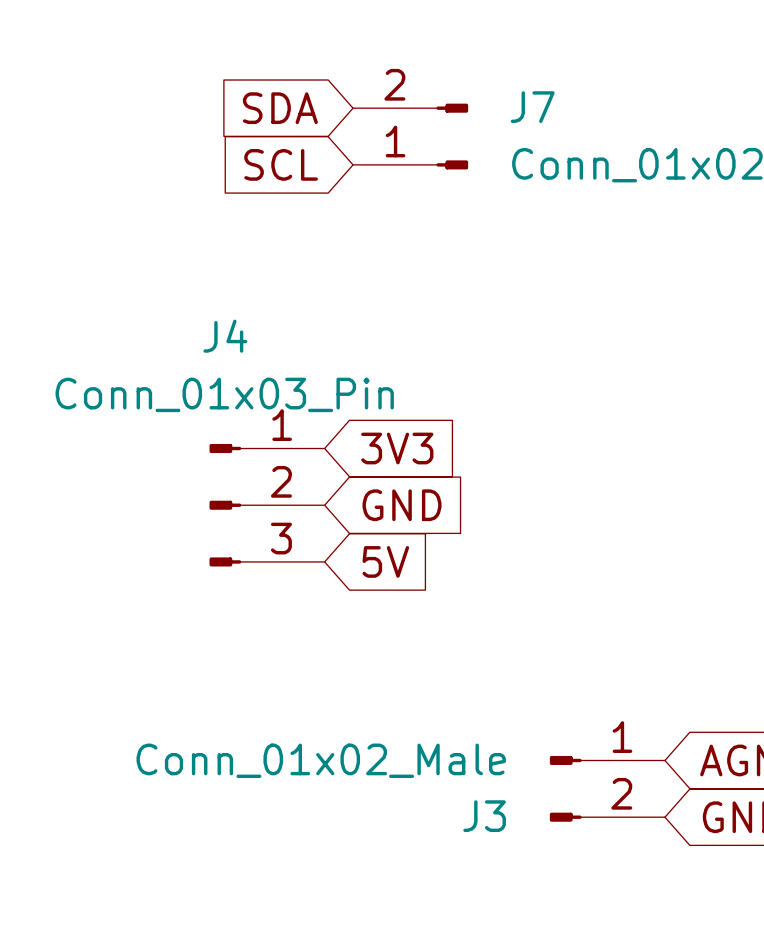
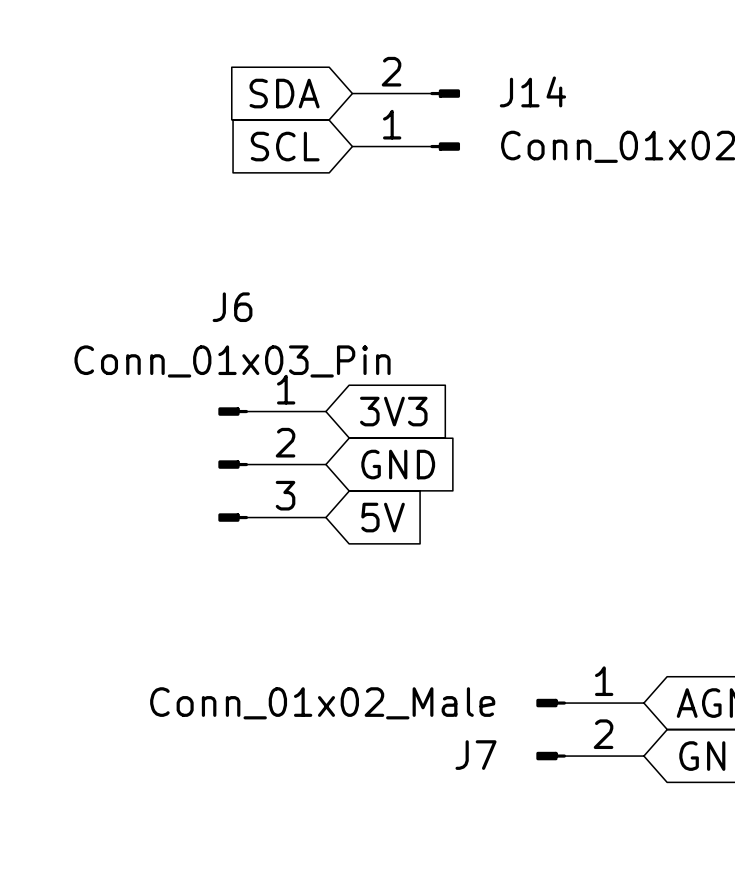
J7 name: J7 (532, 107) -> J14 (532, 91)
J4 name: J4 (225, 336) -> J6 (232, 307)
J3 name: J3 (484, 816) -> J7 (476, 755)

